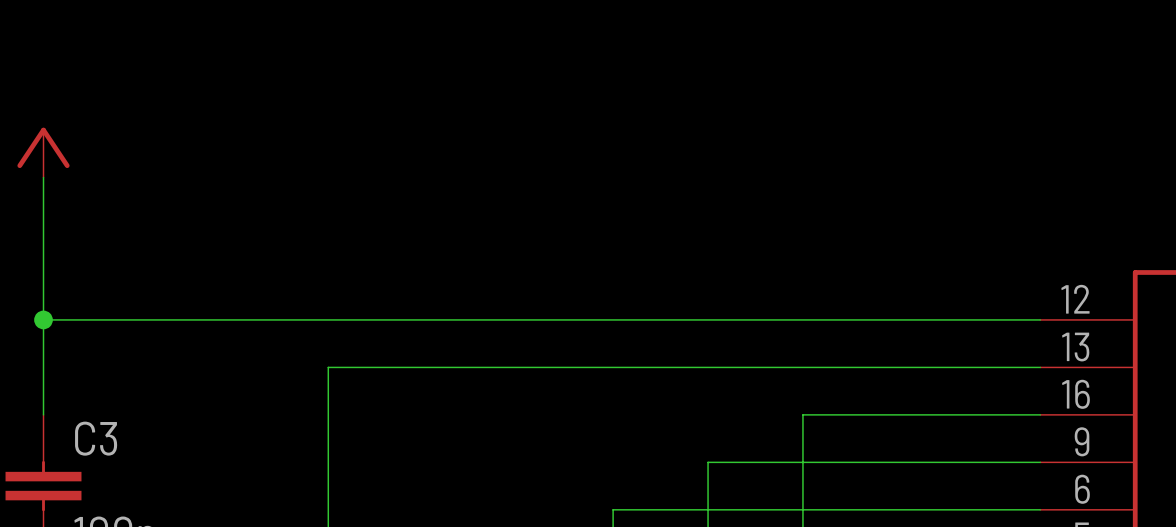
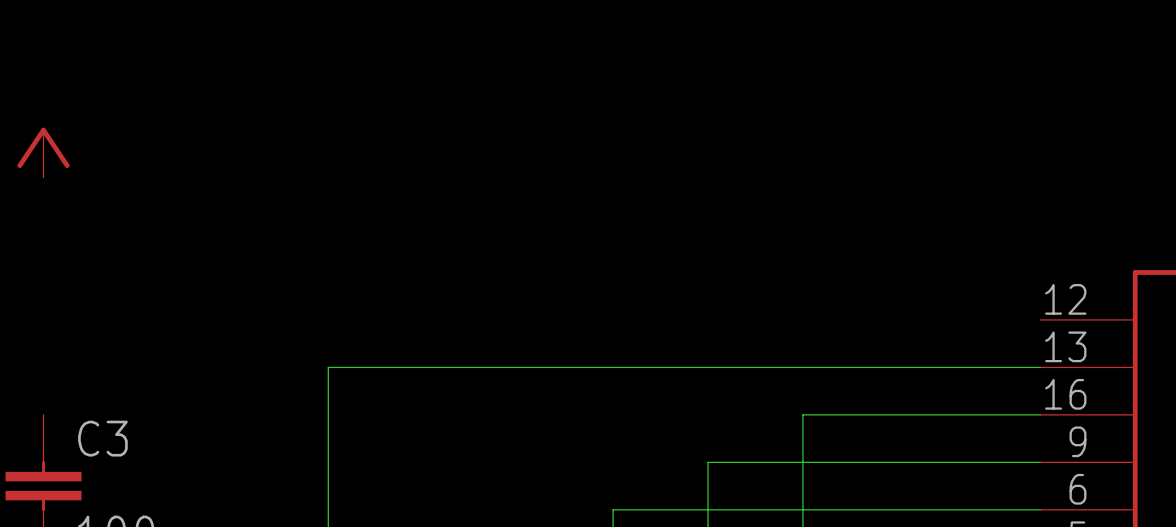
wire: (43, 177) (43, 414) -> none
wire: (43, 319) (1040, 319) -> none
junction: (43, 319) -> none

